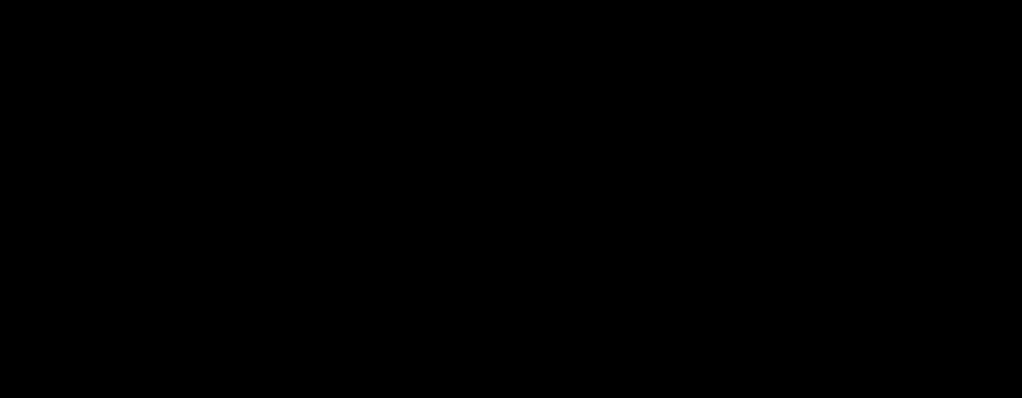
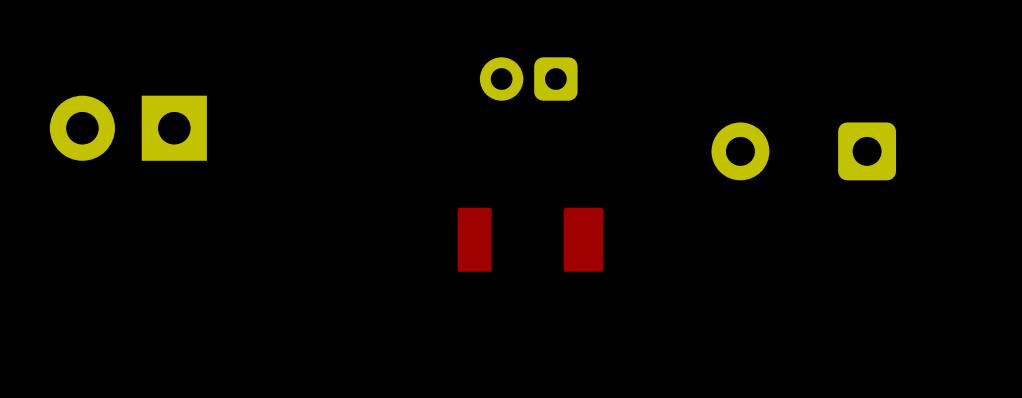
part: none -> (528, 79)
part: none -> (128, 128)
part: none -> (803, 151)
part: none -> (530, 239)

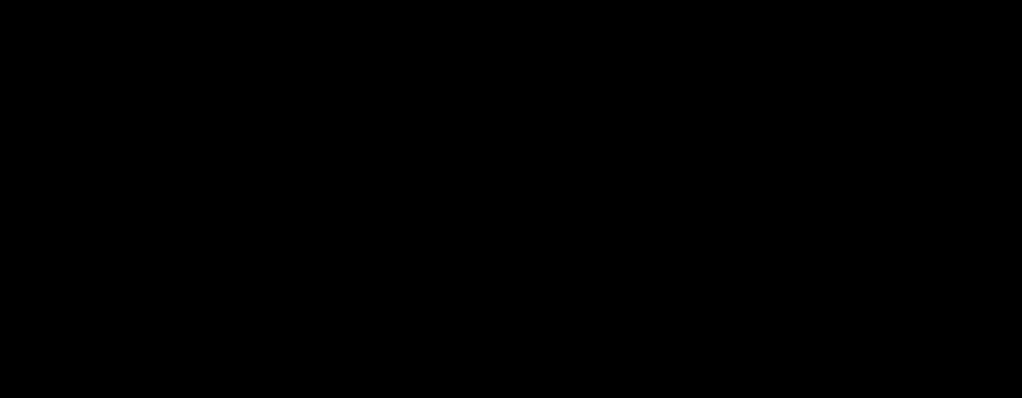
part: (528, 79) -> none
part: (128, 128) -> none
part: (803, 151) -> none
part: (530, 239) -> none

